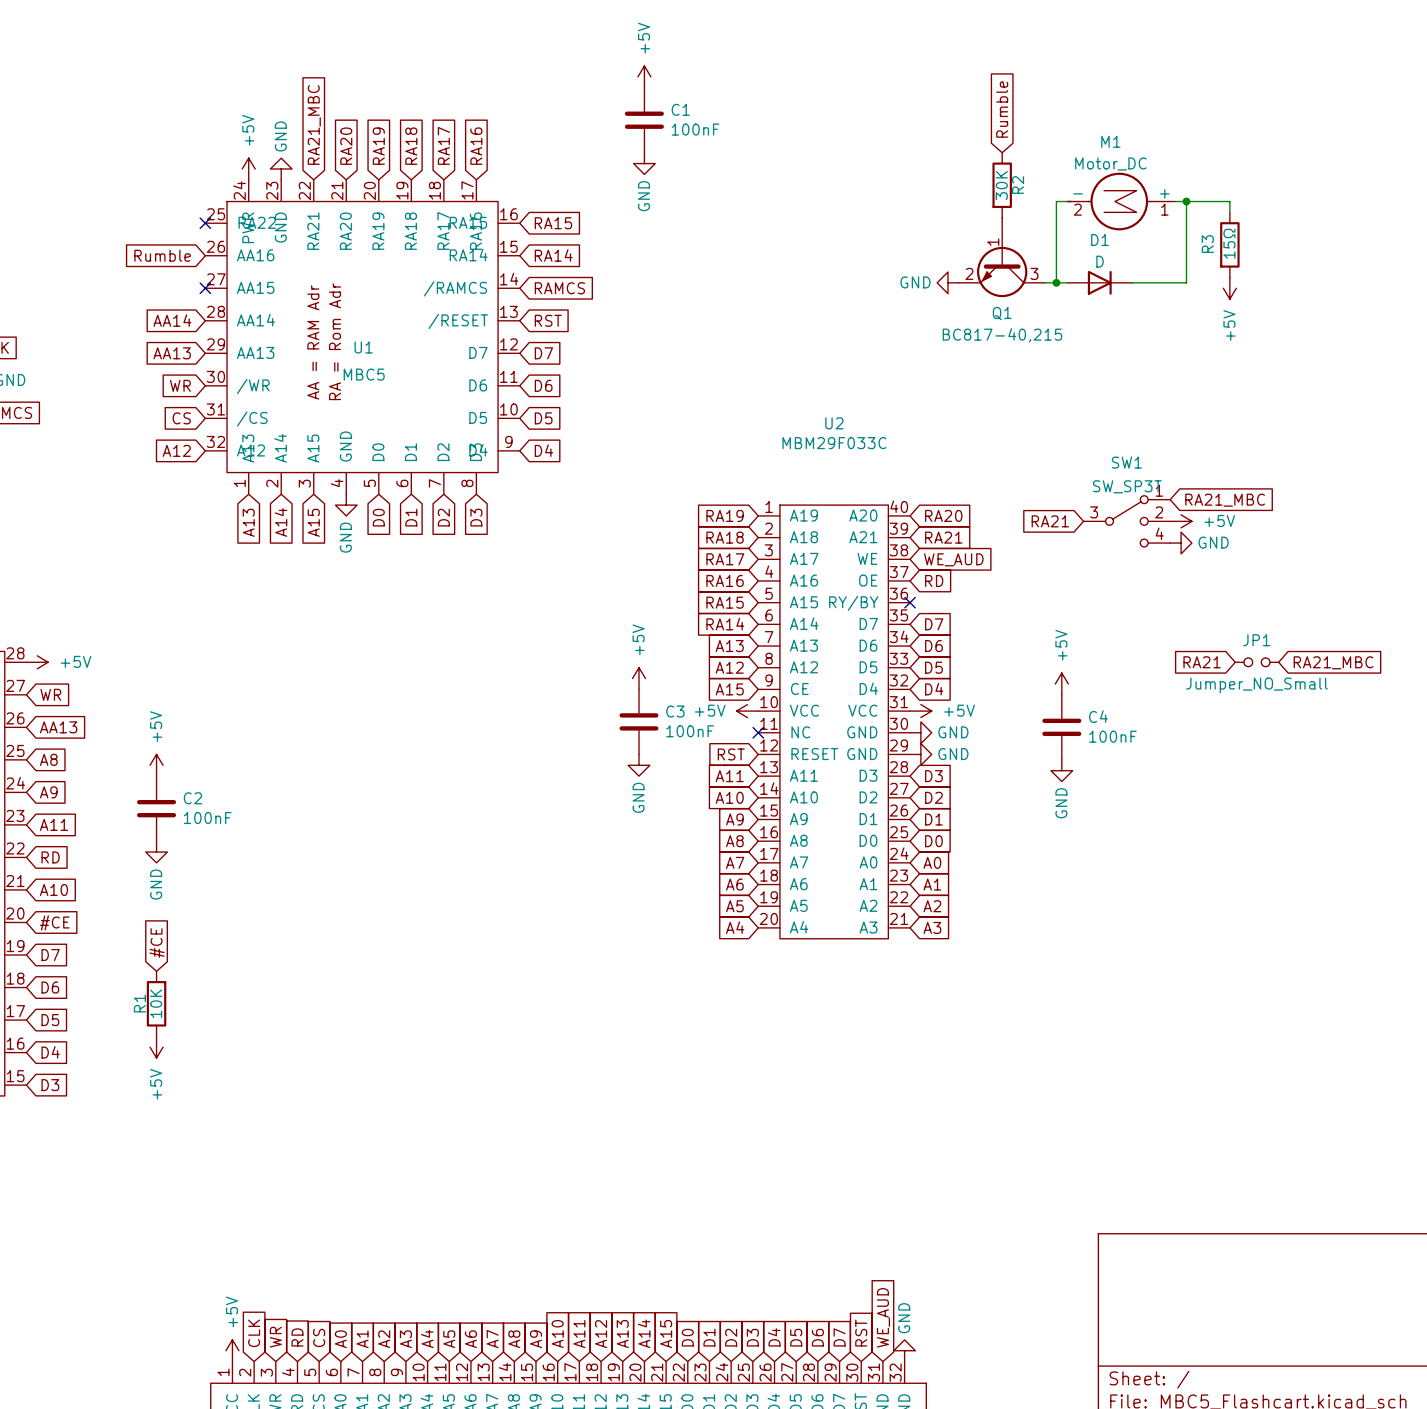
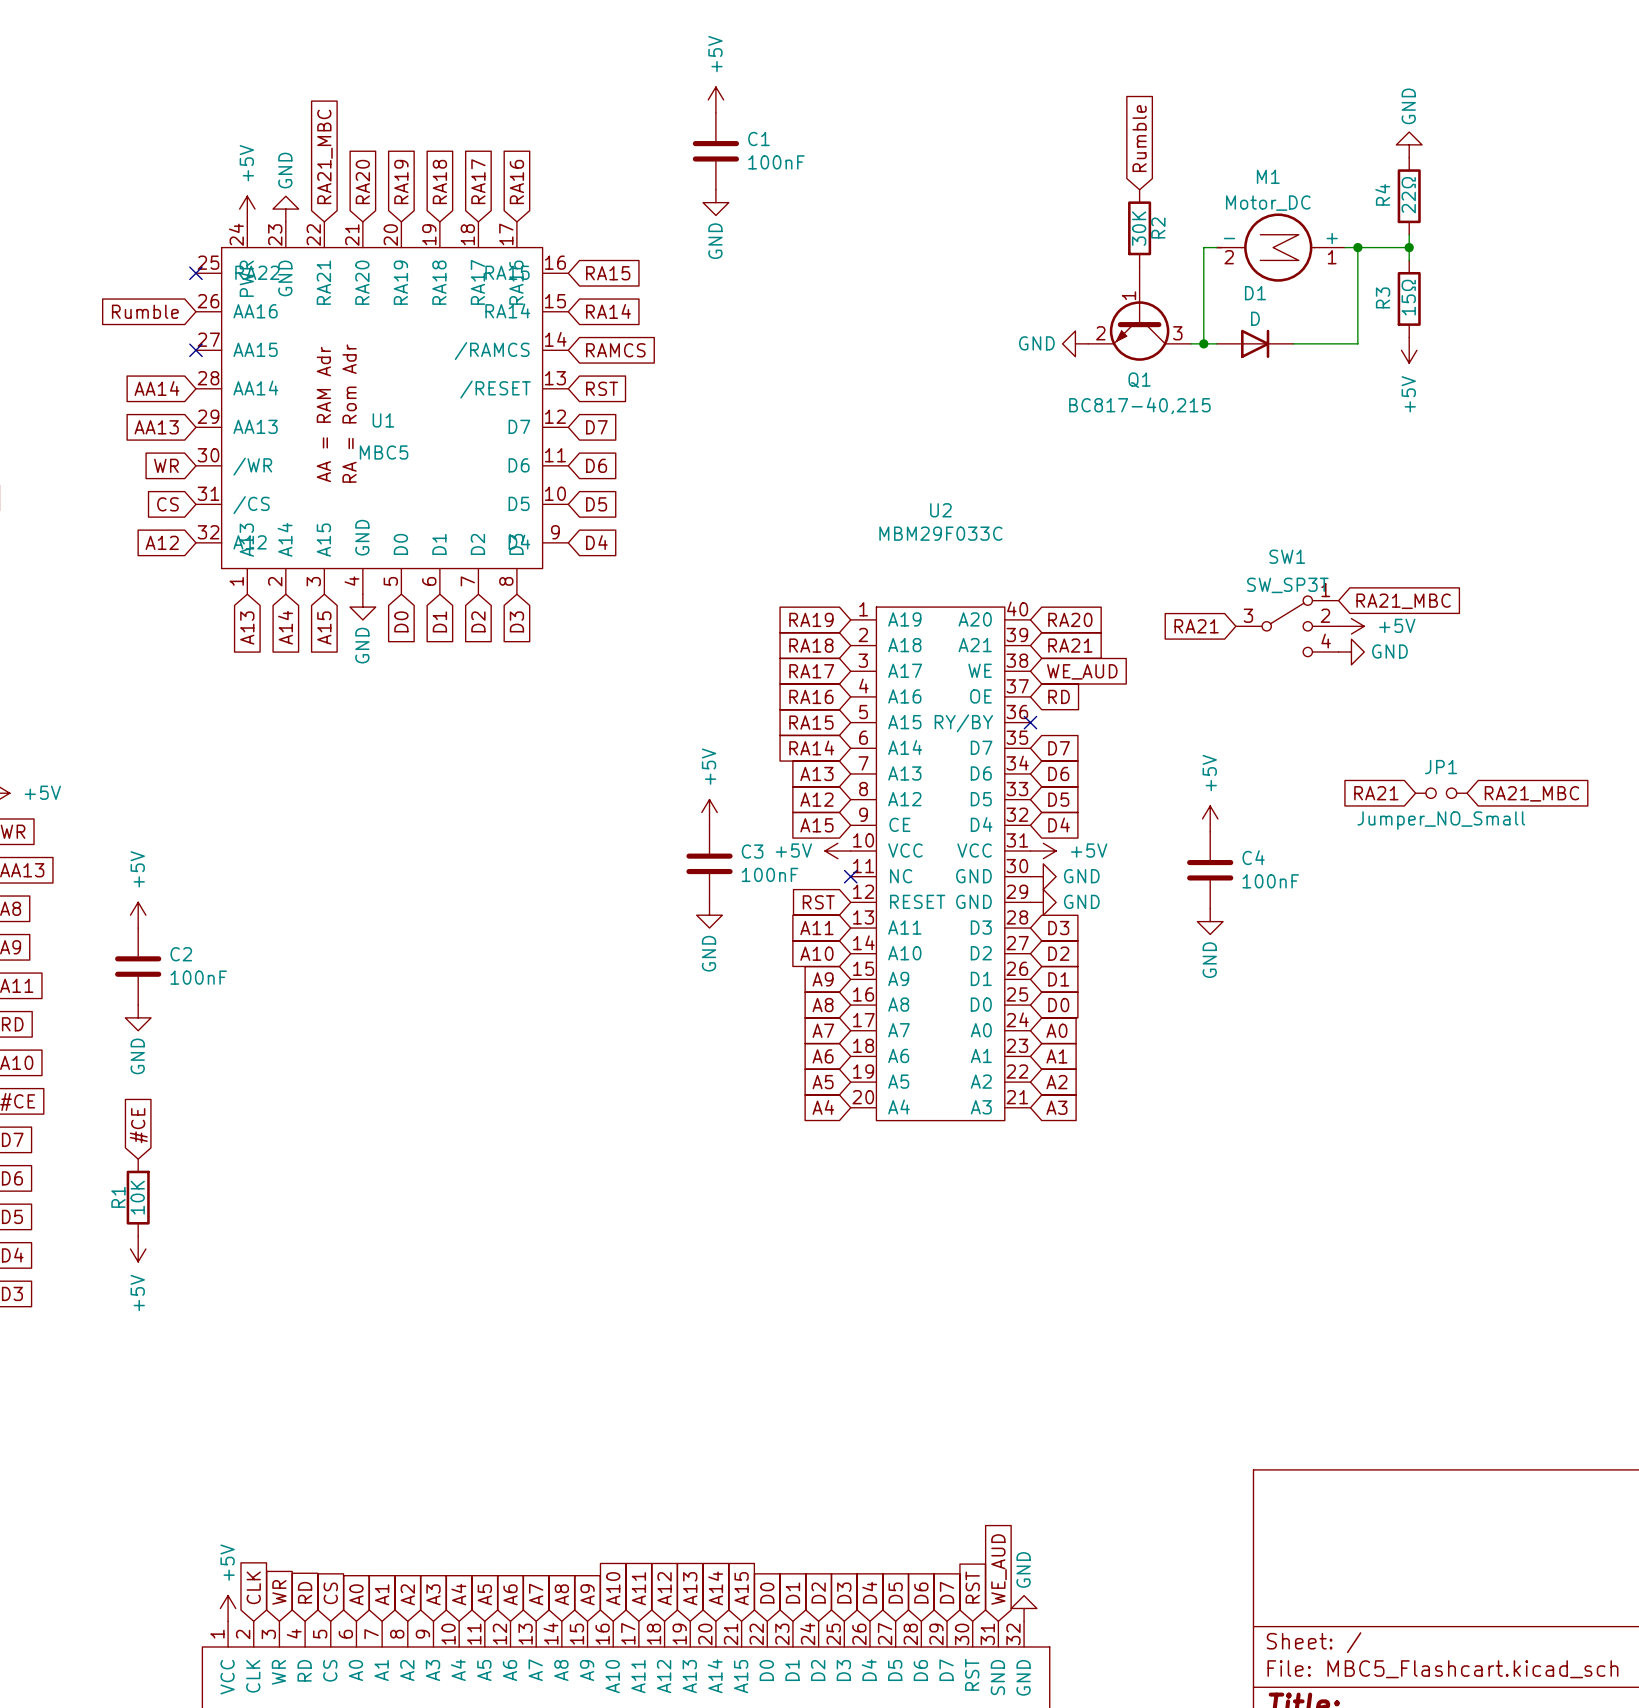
power symbol: none -> GND (1409, 144)
R4: none -> 22Ω (1409, 196)
wire: none -> (1409, 234) (1409, 247)
junction: none -> (1409, 247)

